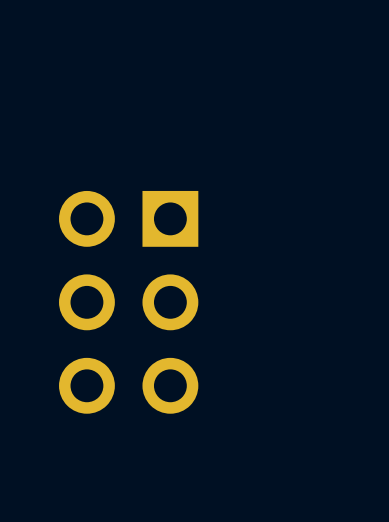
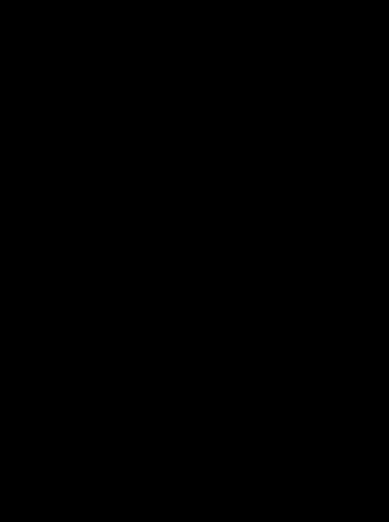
part: (128, 302) -> none

